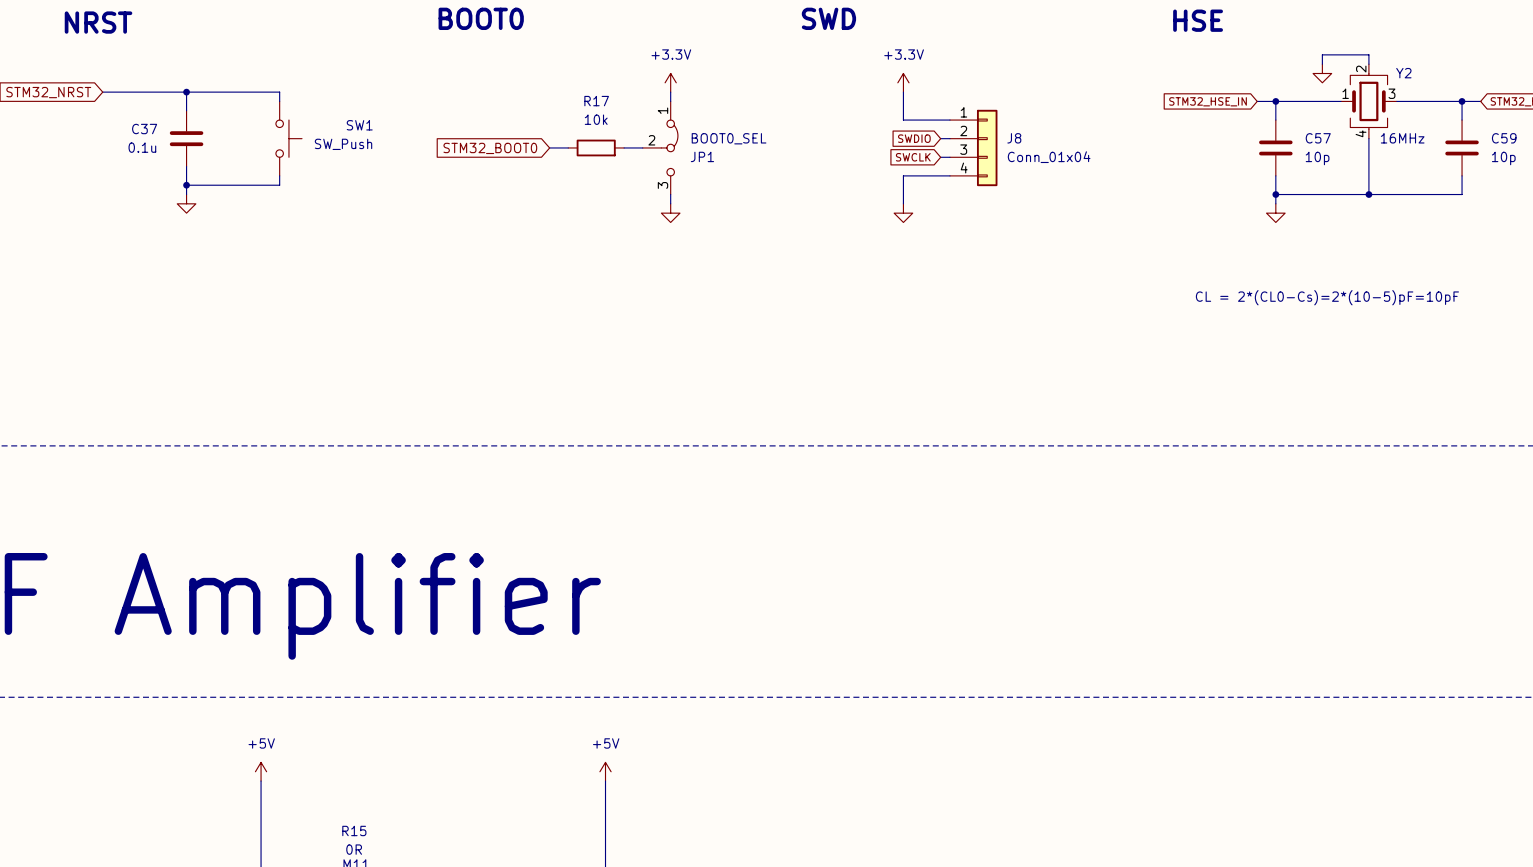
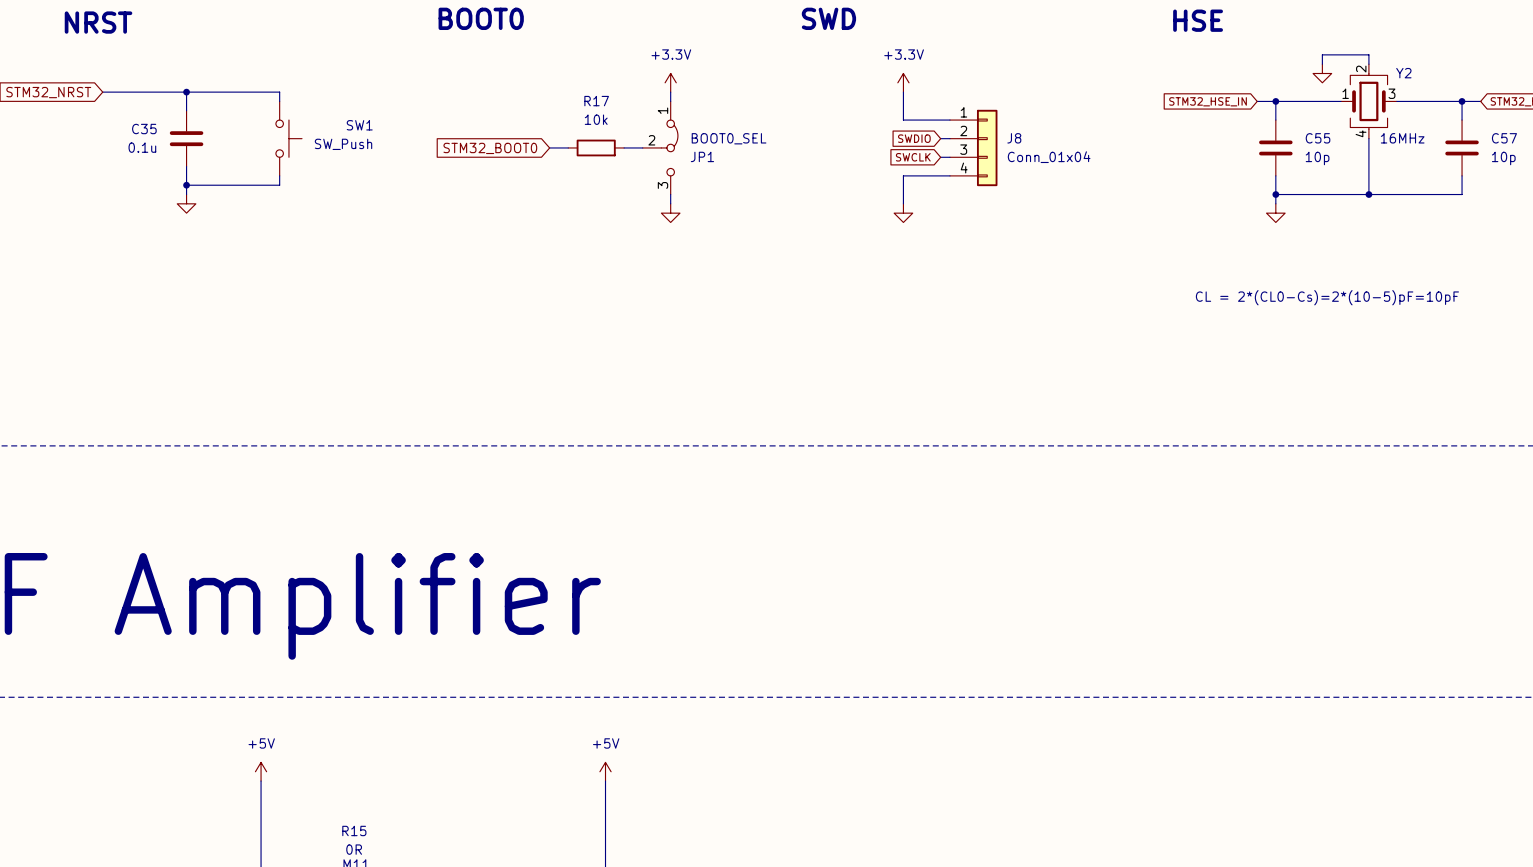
C37 name: C37 (144, 129) -> C35 (144, 129)
C57 name: C57 (1318, 138) -> C55 (1318, 138)
C59 name: C59 (1504, 138) -> C57 (1504, 138)

